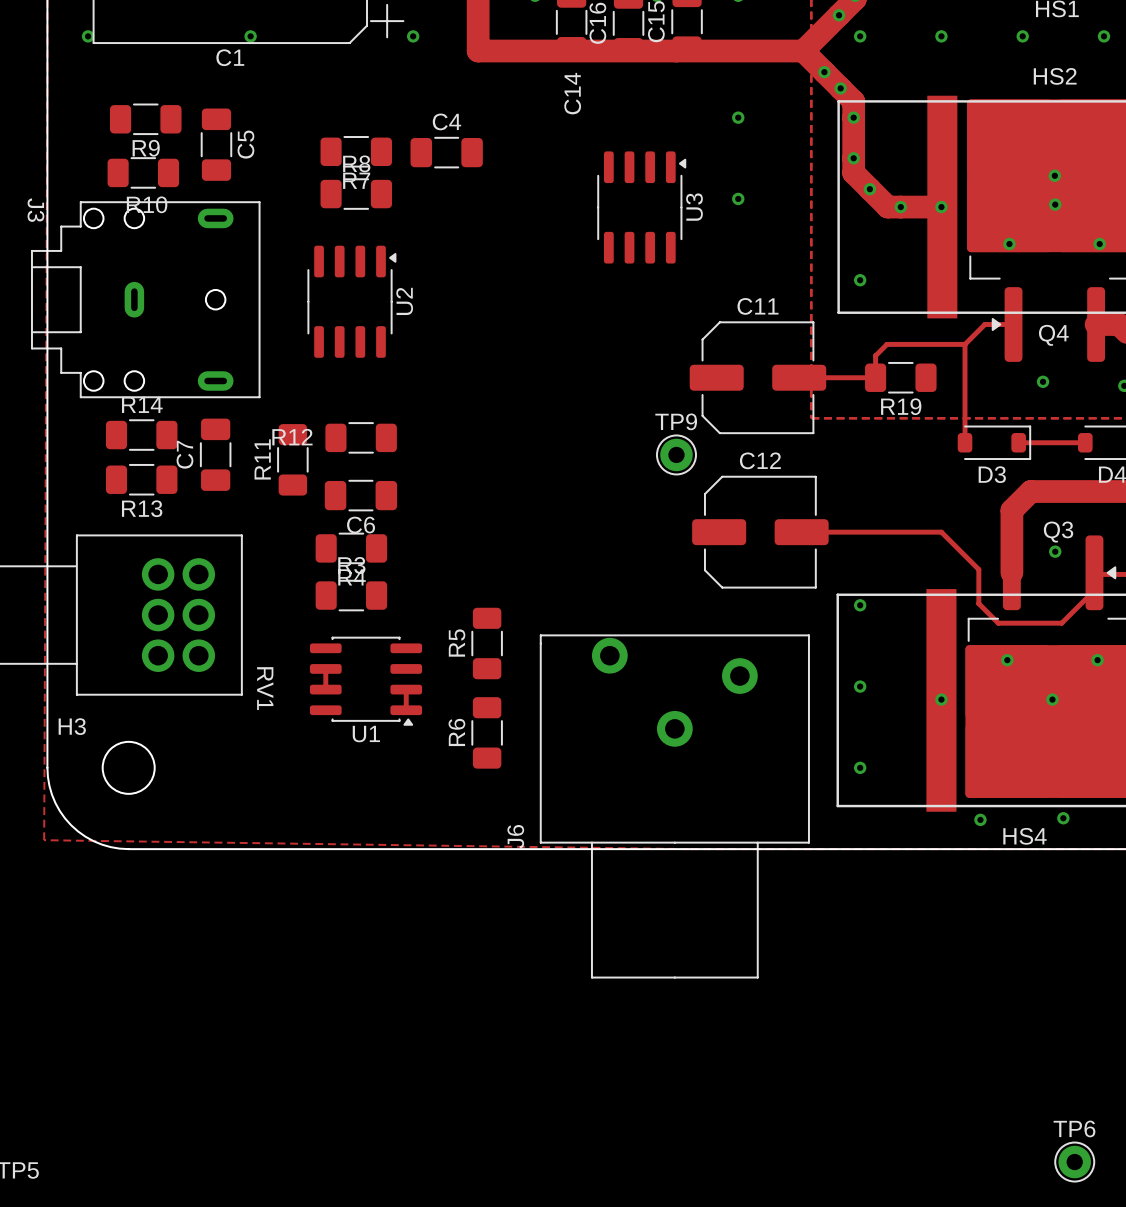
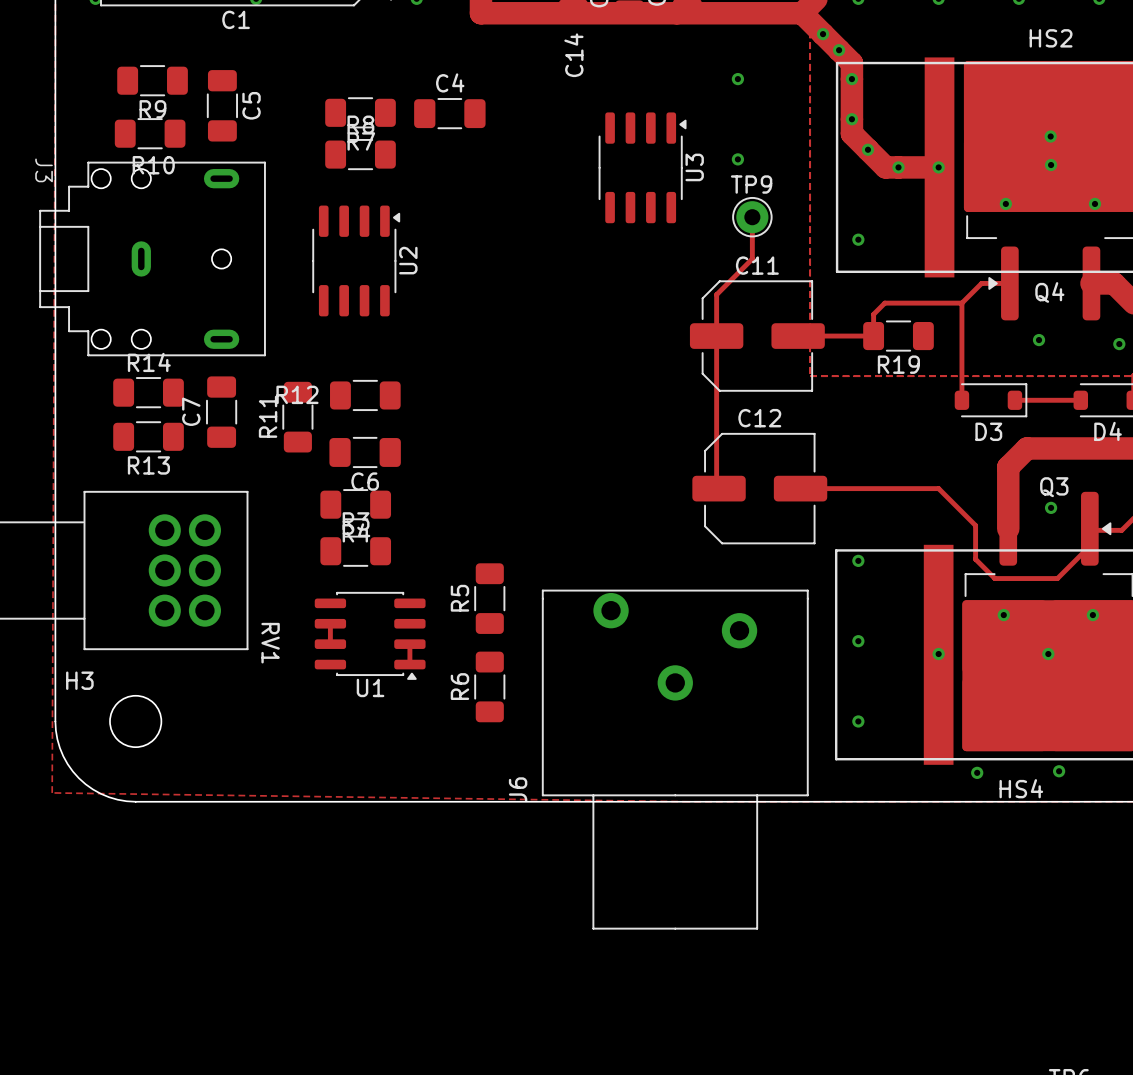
track: none -> (752, 217) (752, 258) (716, 294) (716, 486)
TP9 position: (676, 454) -> (752, 217)

